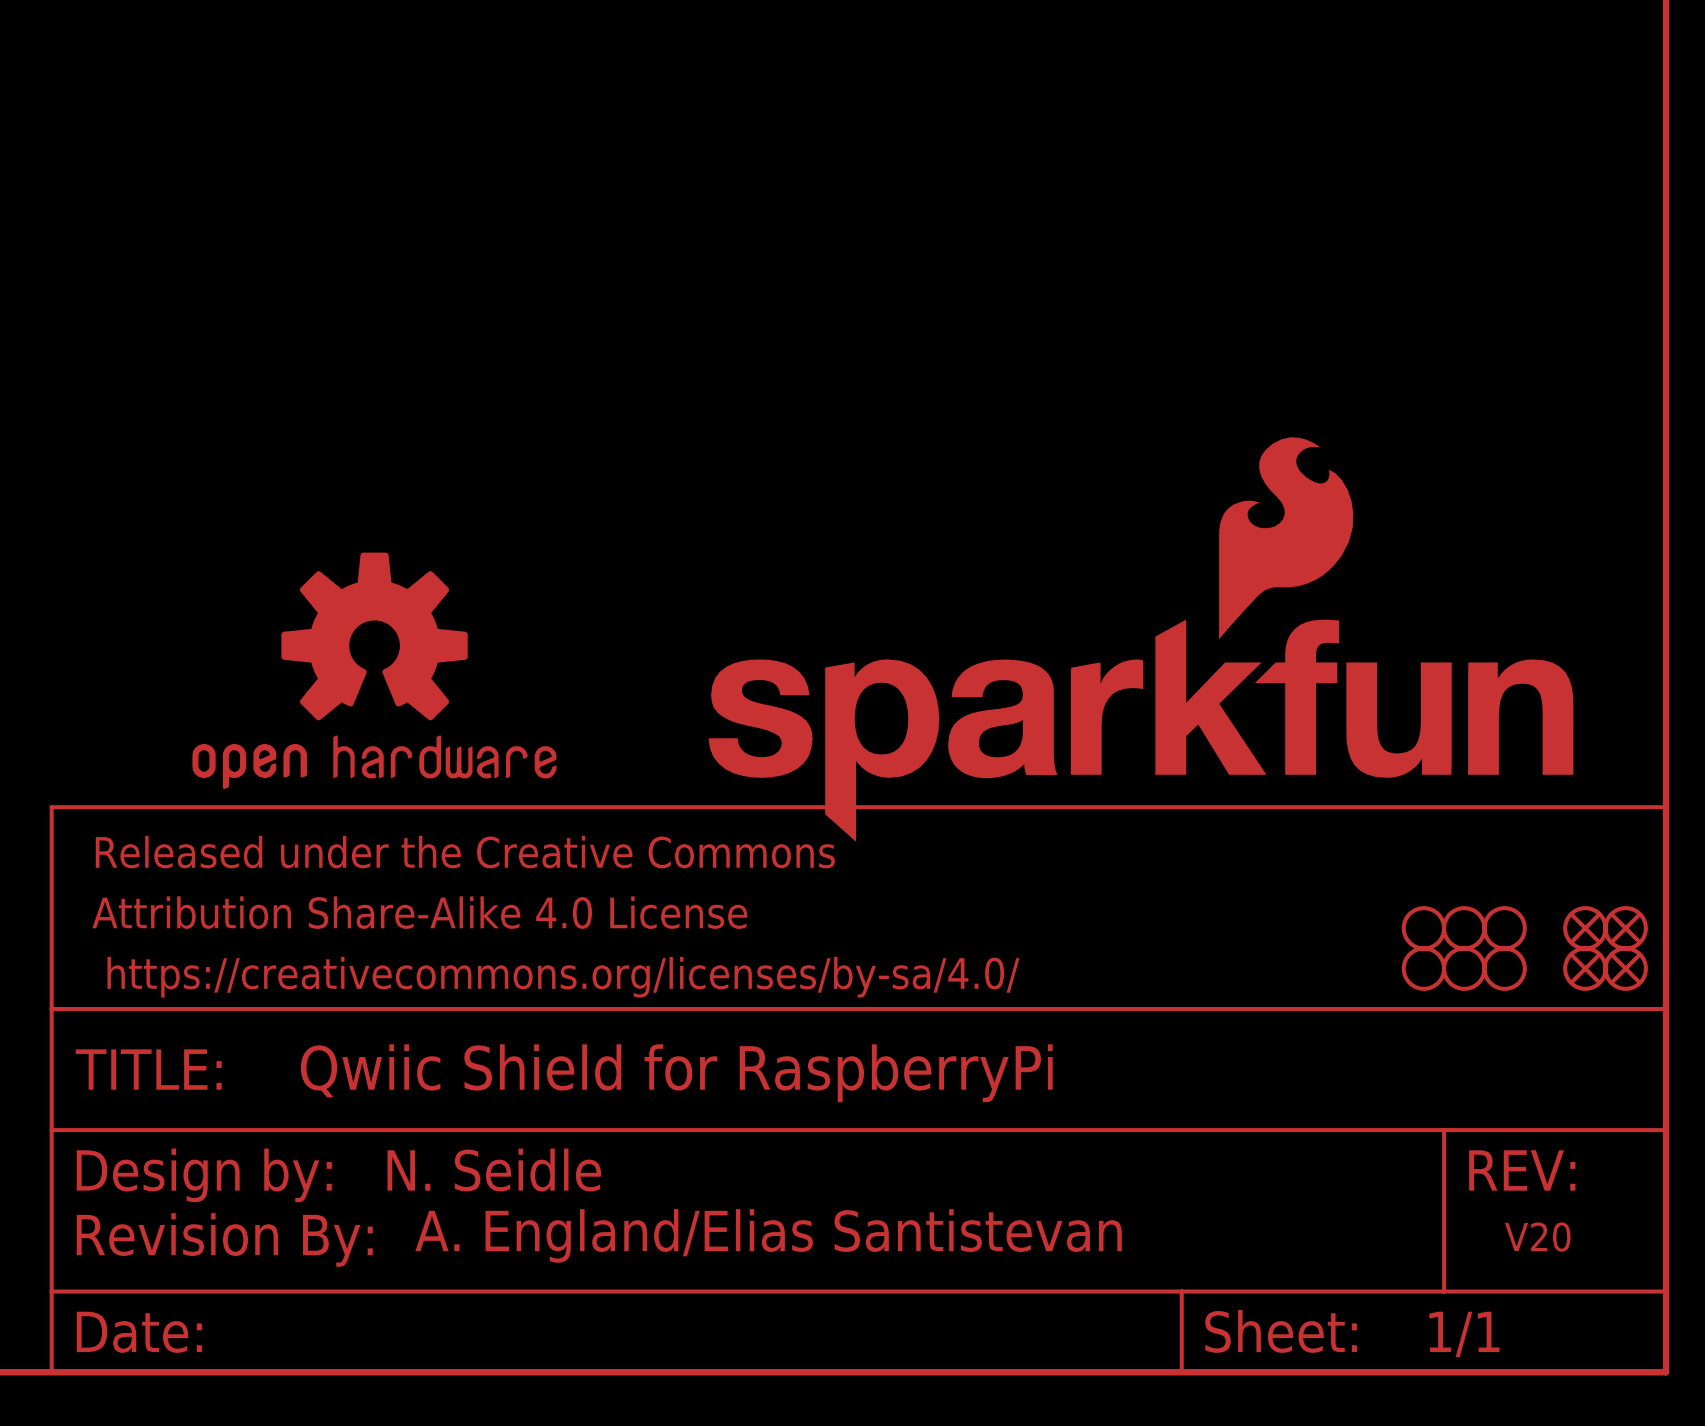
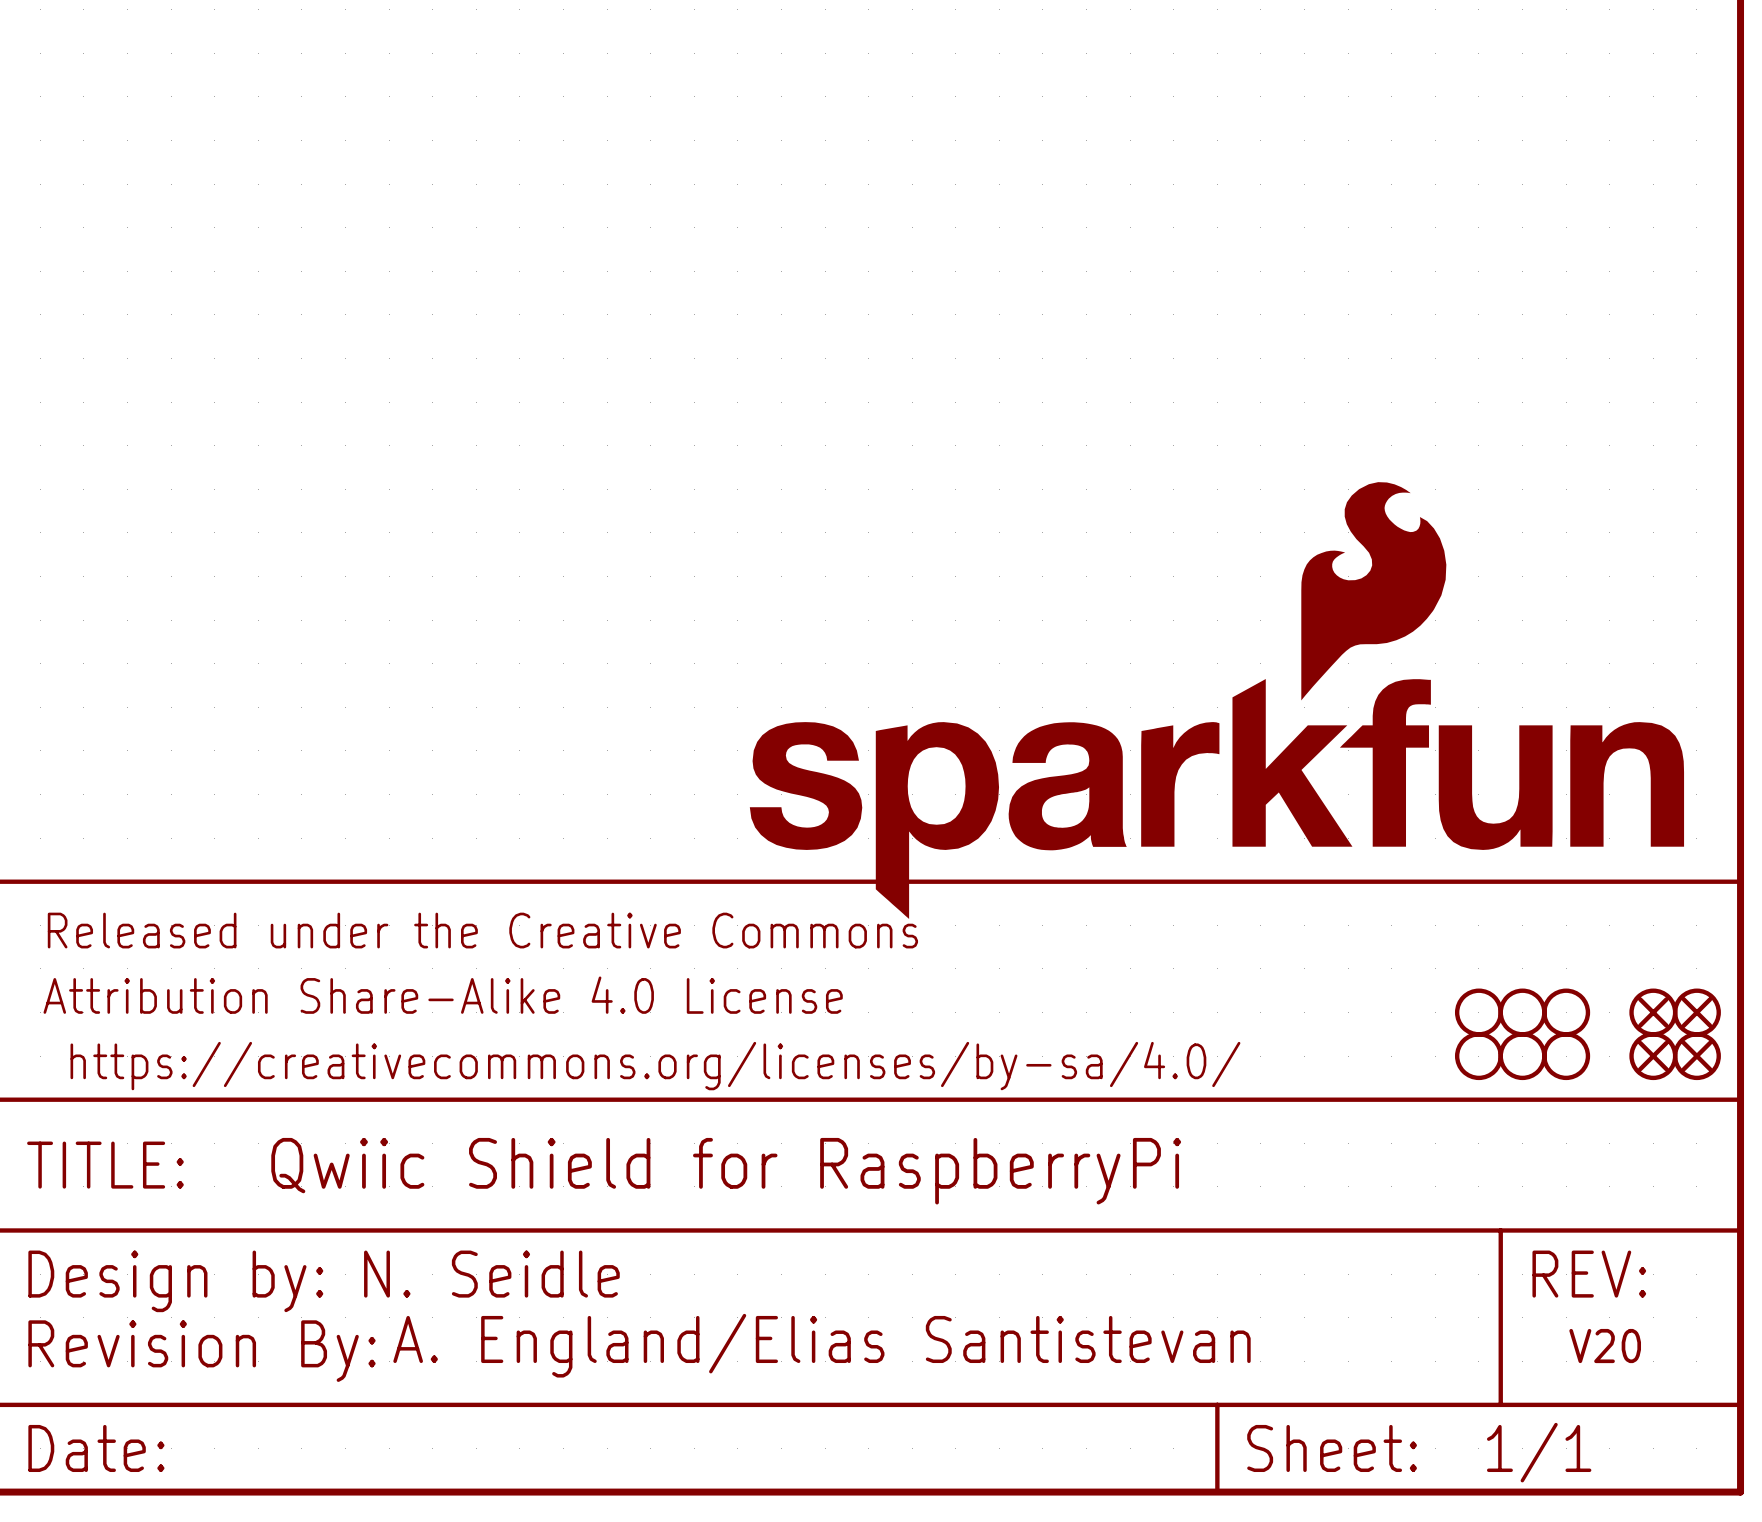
part position: (1141, 639) -> (1216, 700)
part: (374, 670) -> none

